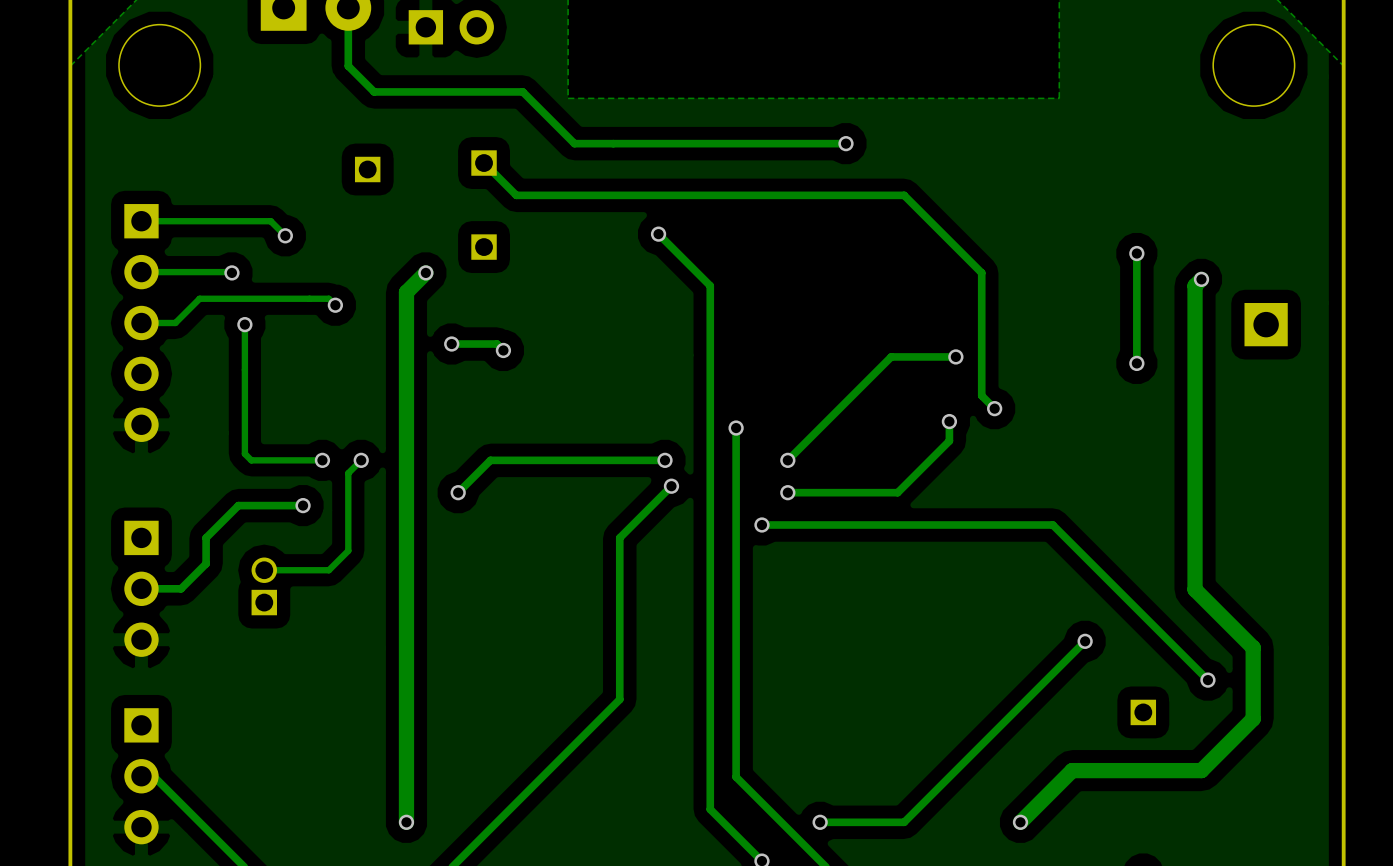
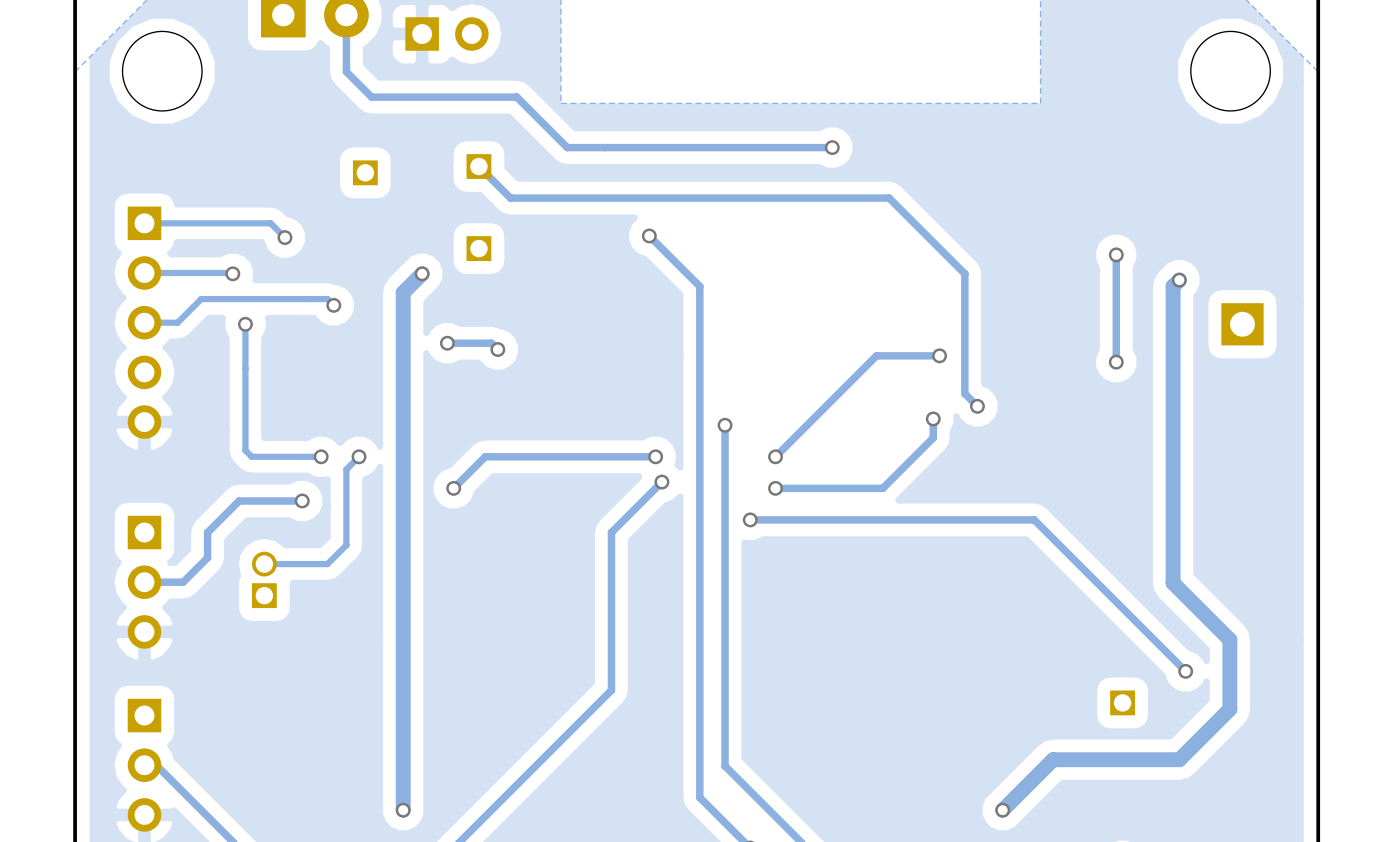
track: (1085, 641) (904, 822) (820, 822) -> none
via: (1085, 641) -> none
via: (820, 822) -> none

